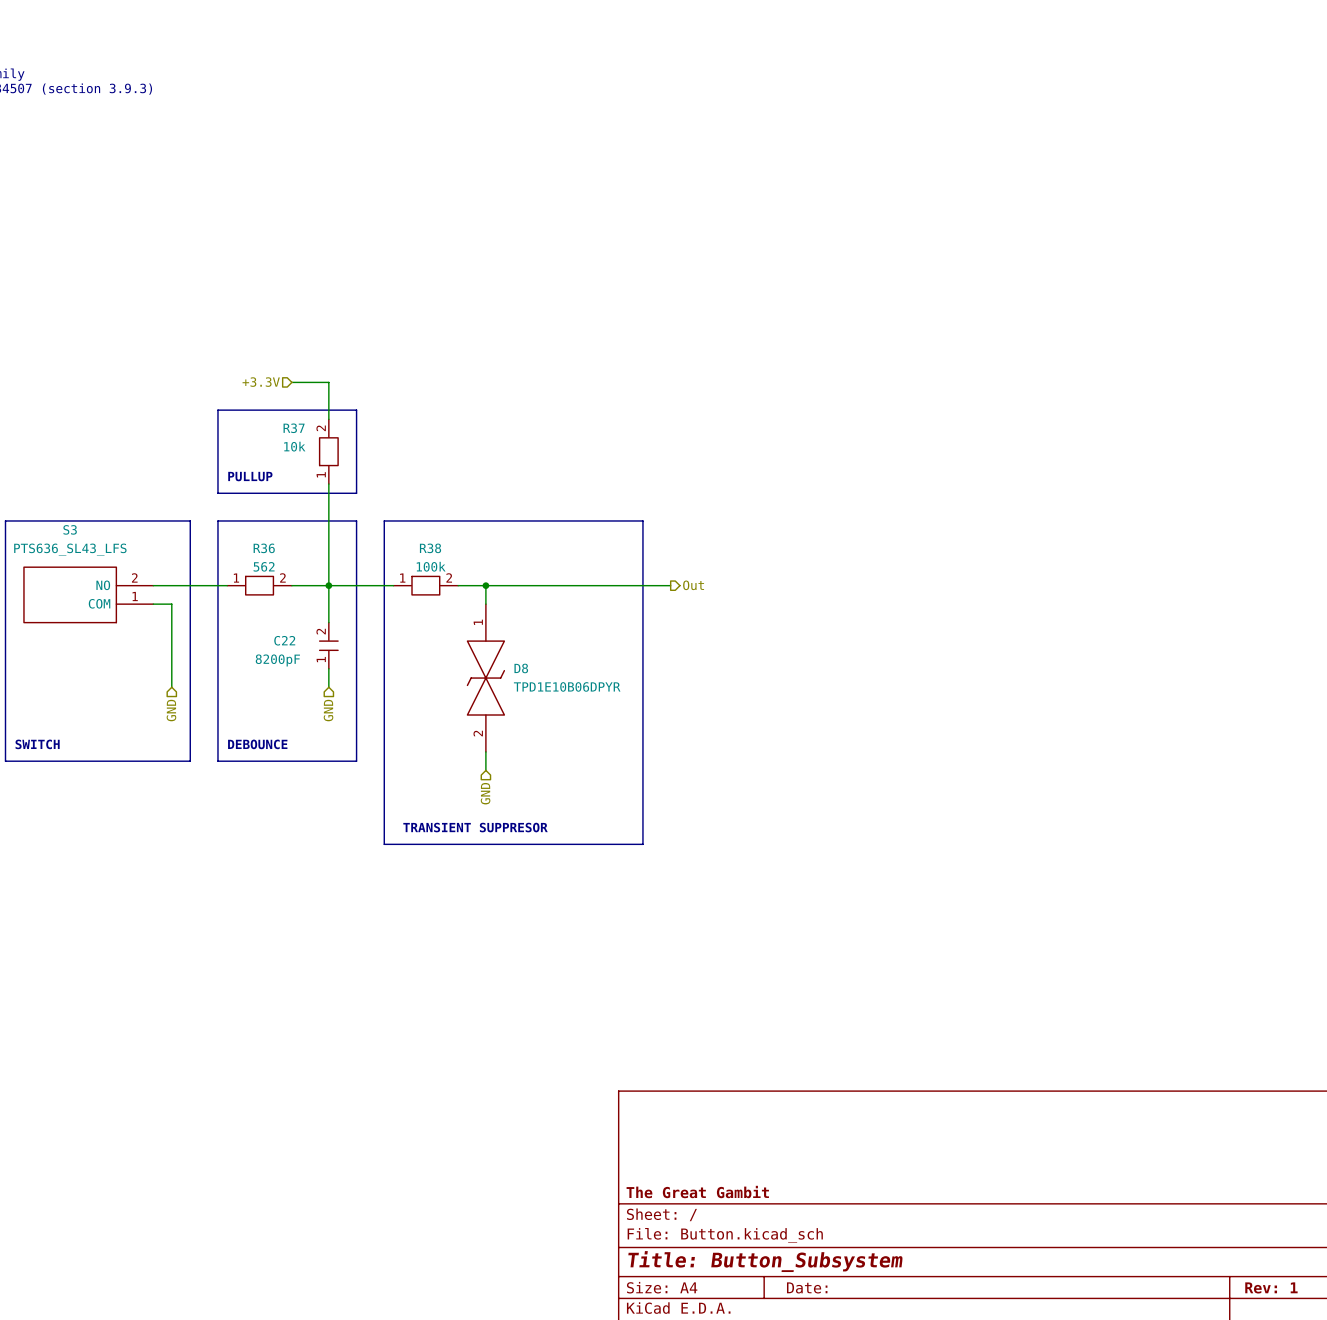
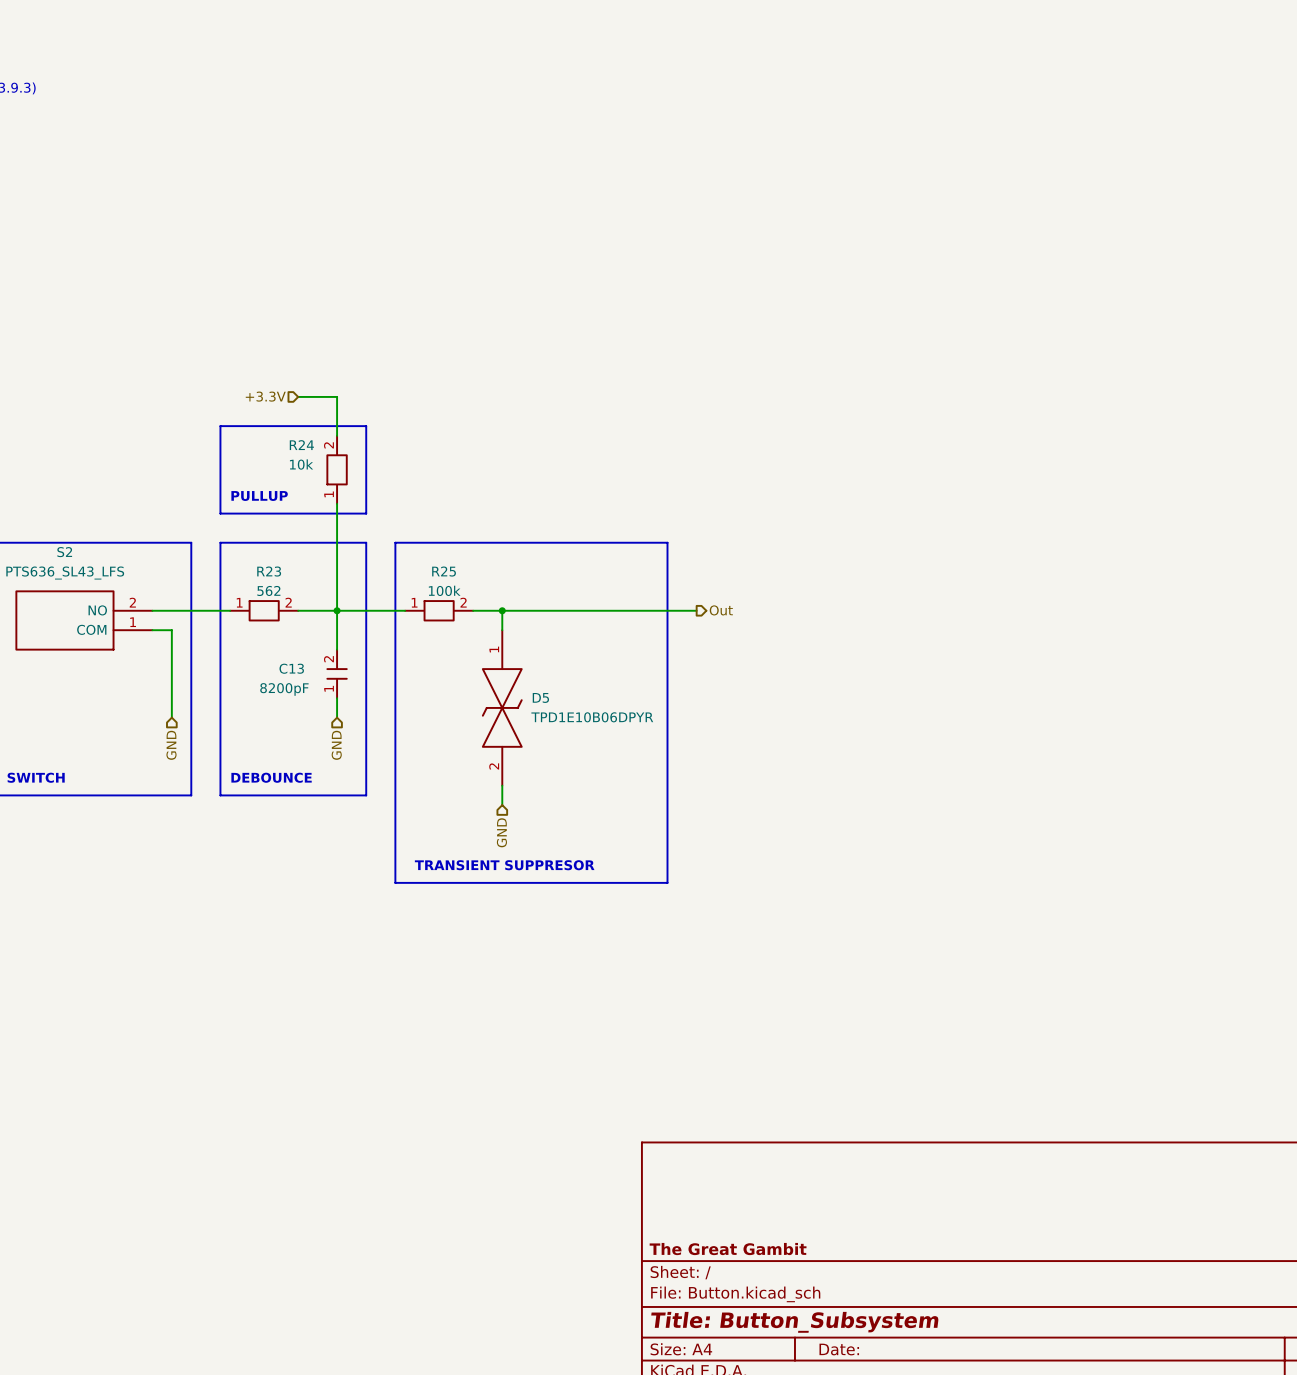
R37 name: R37 (294, 428) -> R24 (301, 445)
S3 name: S3 (70, 529) -> S2 (64, 552)
R36 name: R36 (264, 548) -> R23 (269, 571)
R38 name: R38 (430, 548) -> R25 (444, 571)
C22 name: C22 (284, 640) -> C13 (291, 668)
D8 name: D8 (521, 668) -> D5 (540, 697)

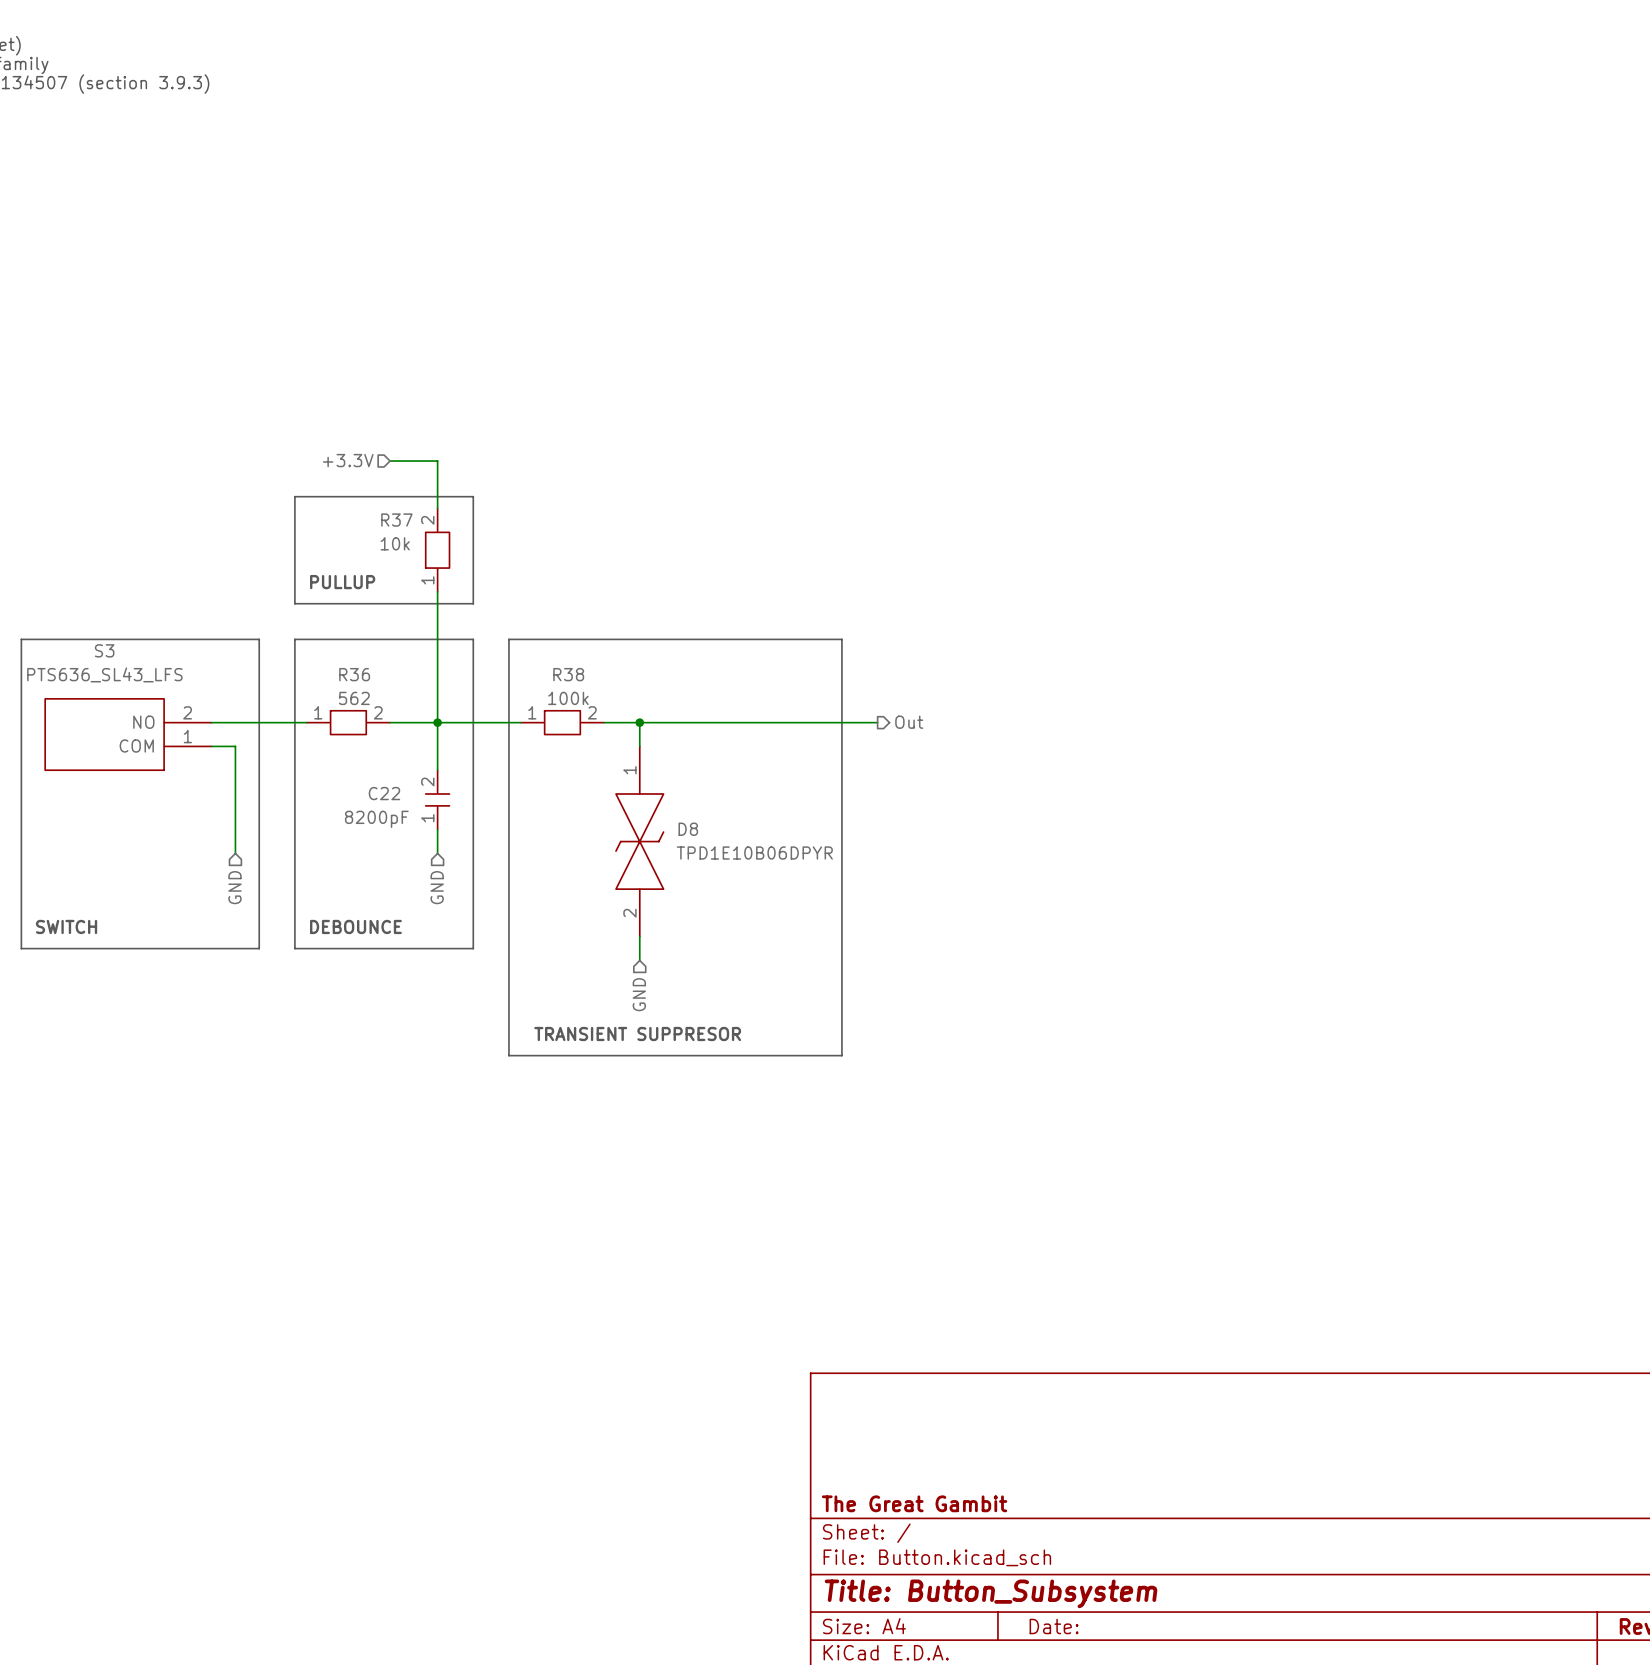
R24 name: R24 (301, 445) -> R37 (396, 520)
S2 name: S2 (64, 552) -> S3 (104, 650)
R23 name: R23 (269, 571) -> R36 (354, 674)
R25 name: R25 (444, 571) -> R38 (568, 674)
C13 name: C13 (291, 668) -> C22 (384, 793)
D5 name: D5 (540, 697) -> D8 (688, 829)

